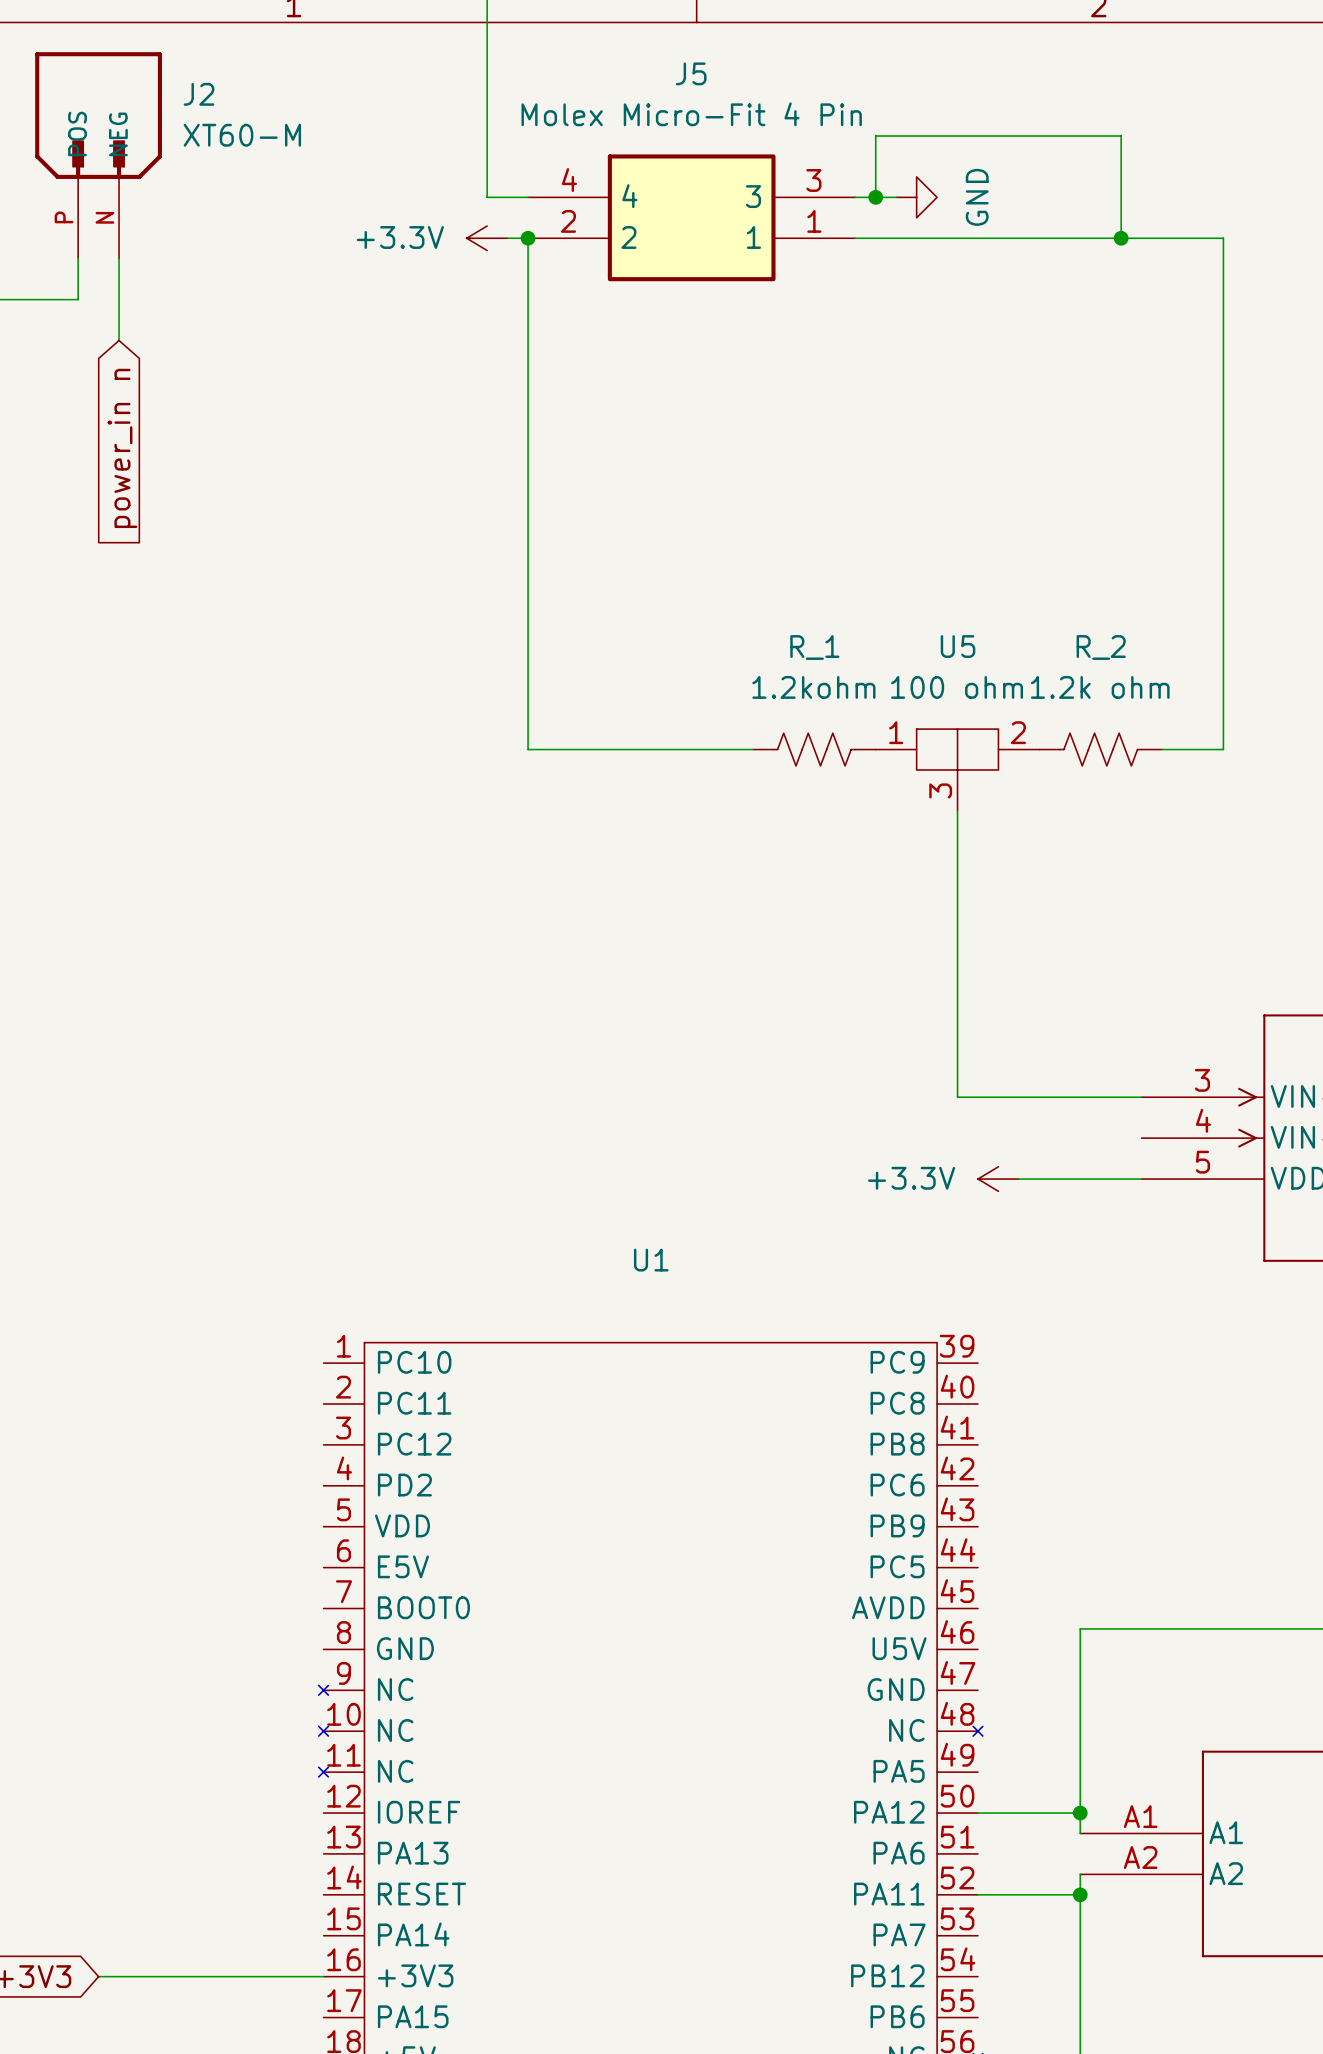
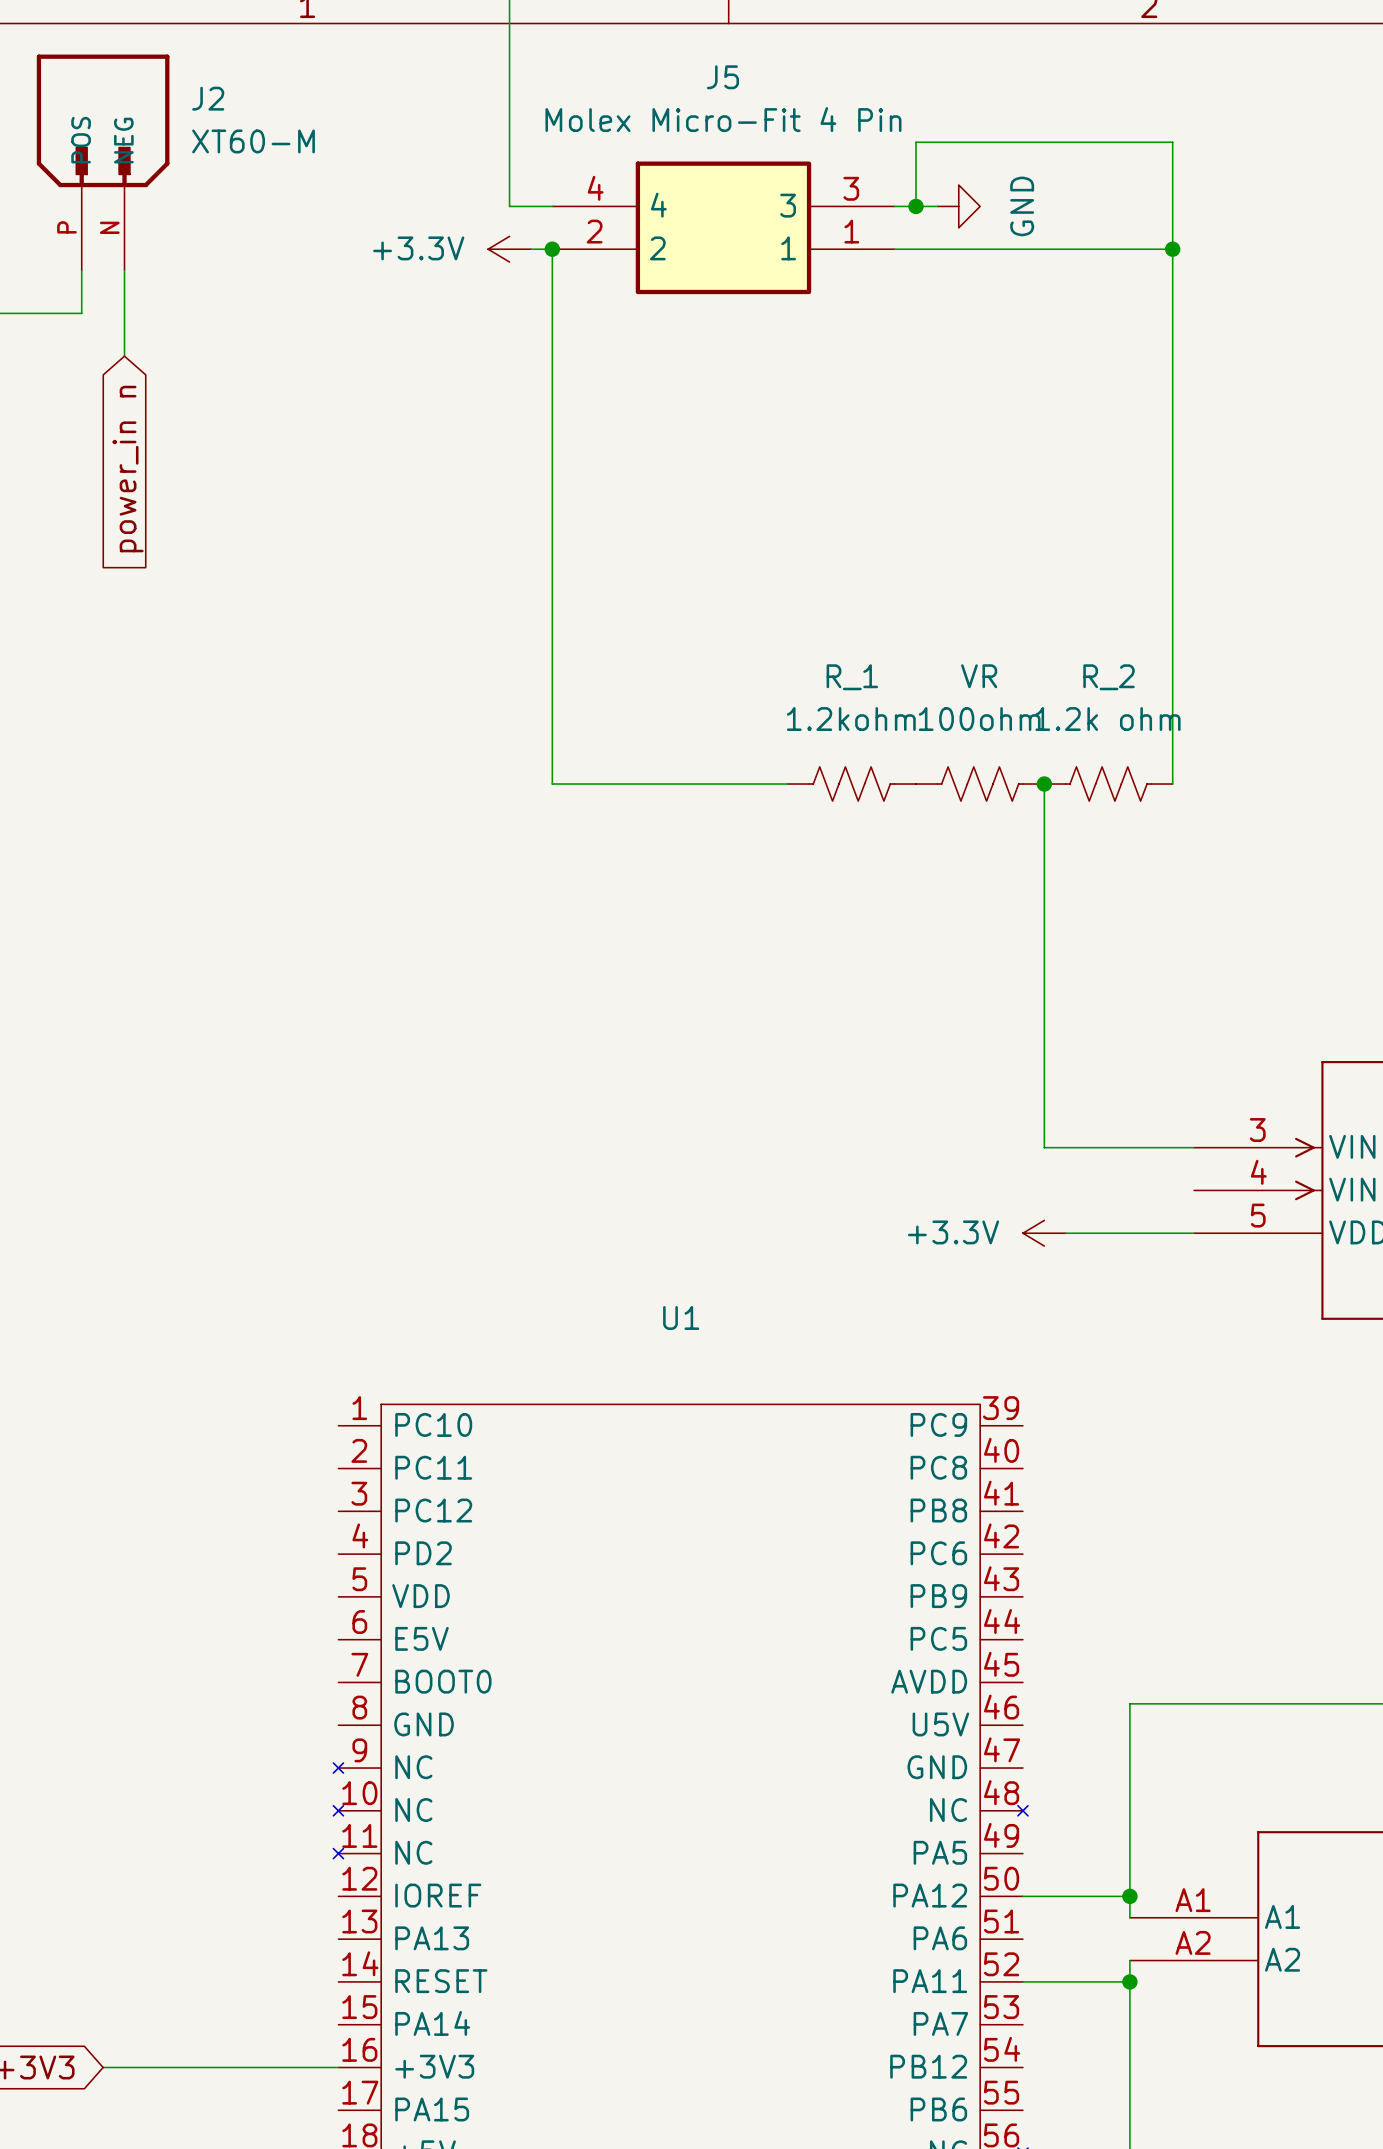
wire: (1121, 238) (1223, 238) (1223, 749) (1162, 749) -> (1172, 249) (1172, 784)
VR: none -> 100ohm (980, 784)
junction: none -> (1044, 784)
R_2 position: (1100, 749) -> (1108, 784)
U5: 100 ohm (957, 770) -> none
wire: (957, 810) (957, 1097) (998, 1097) -> (1044, 784) (1044, 1147)

